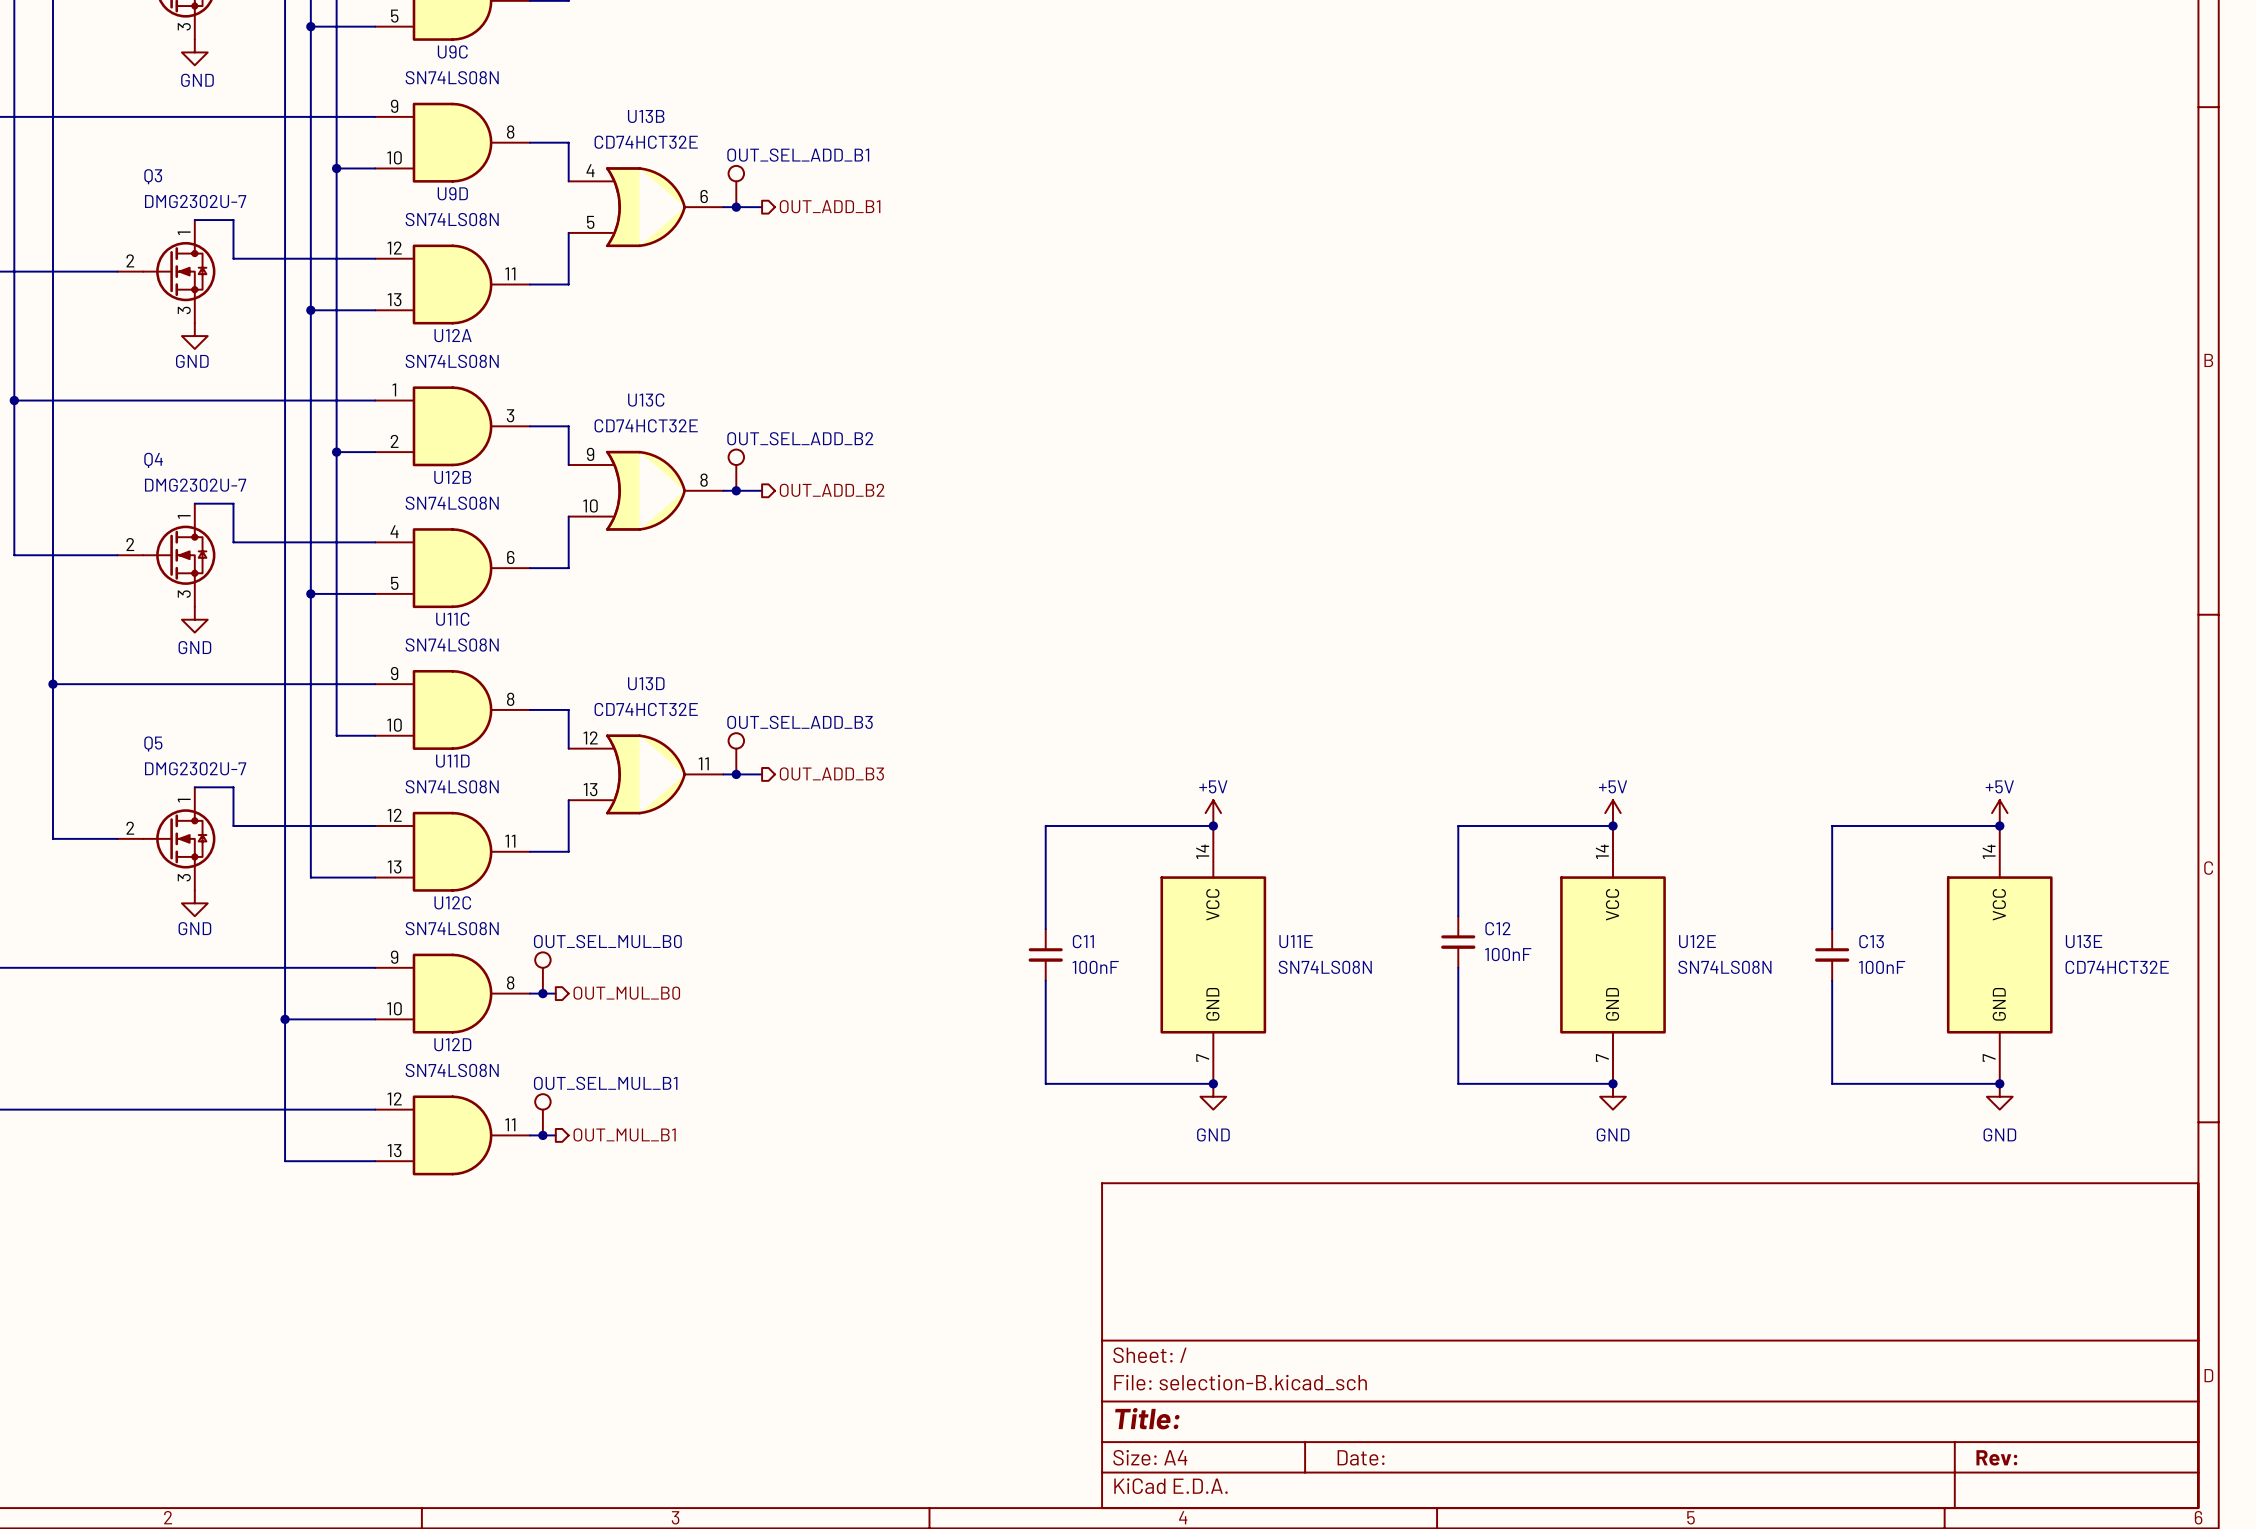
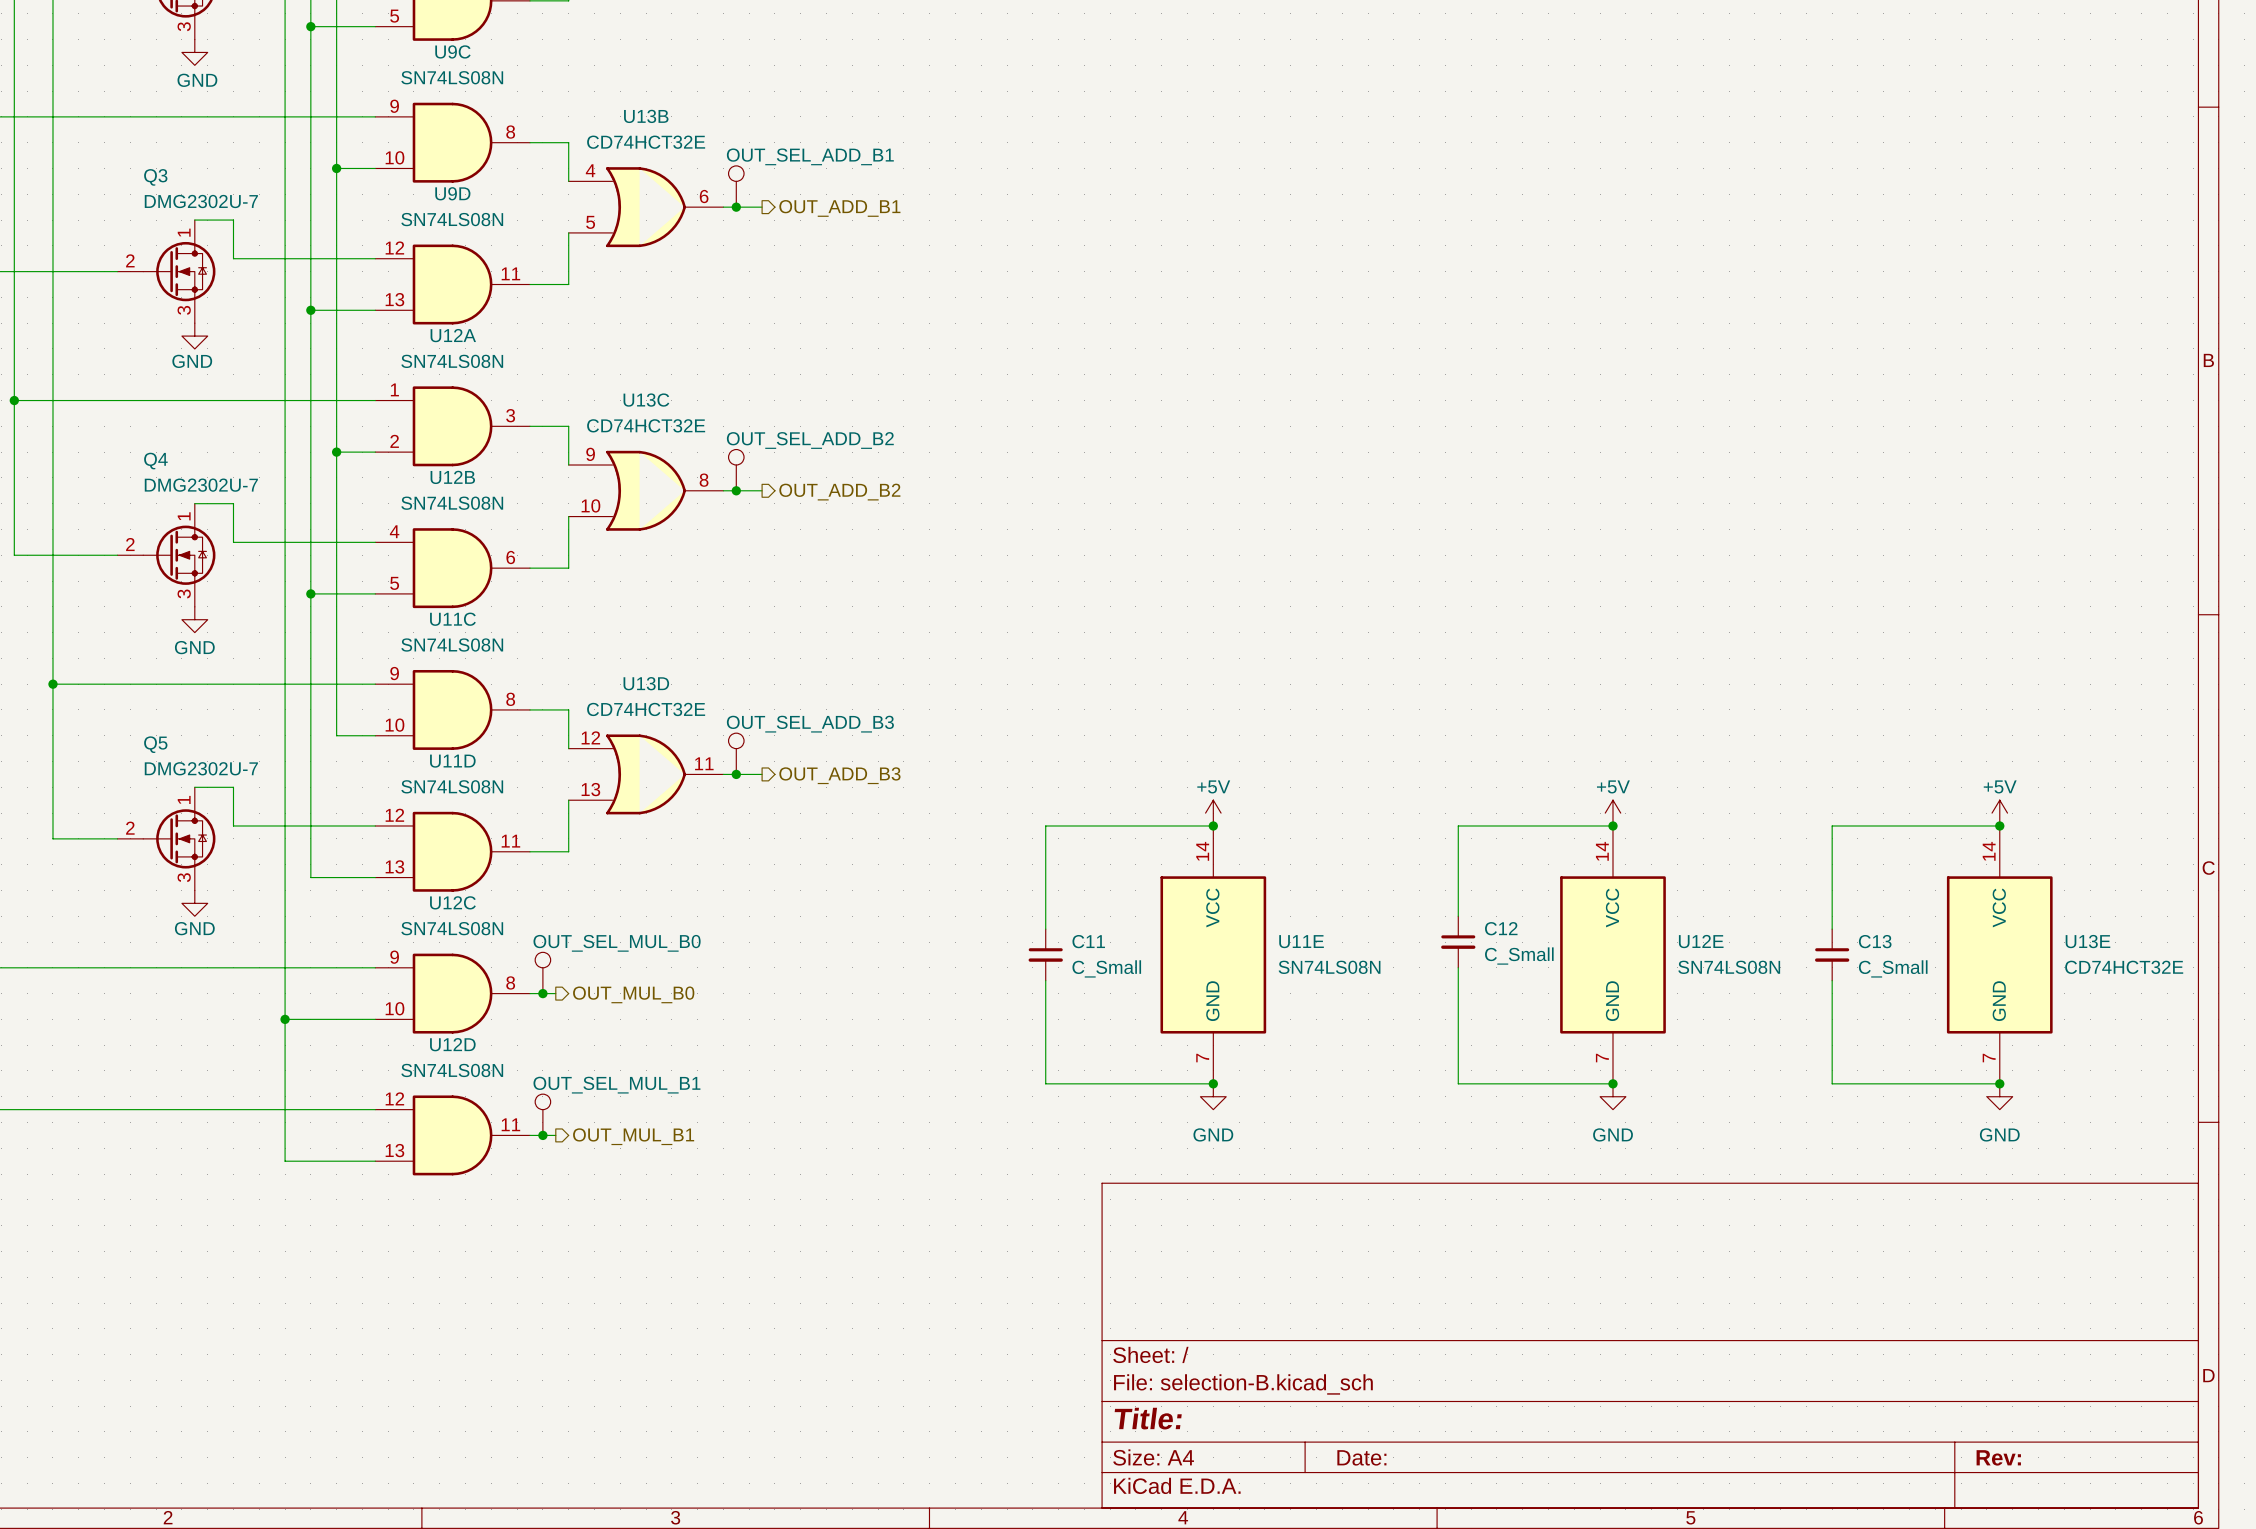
C12 value: 100nF (1508, 954) -> C_Small (1519, 956)
C11 value: 100nF (1095, 967) -> C_Small (1106, 968)
C13 value: 100nF (1882, 967) -> C_Small (1893, 968)

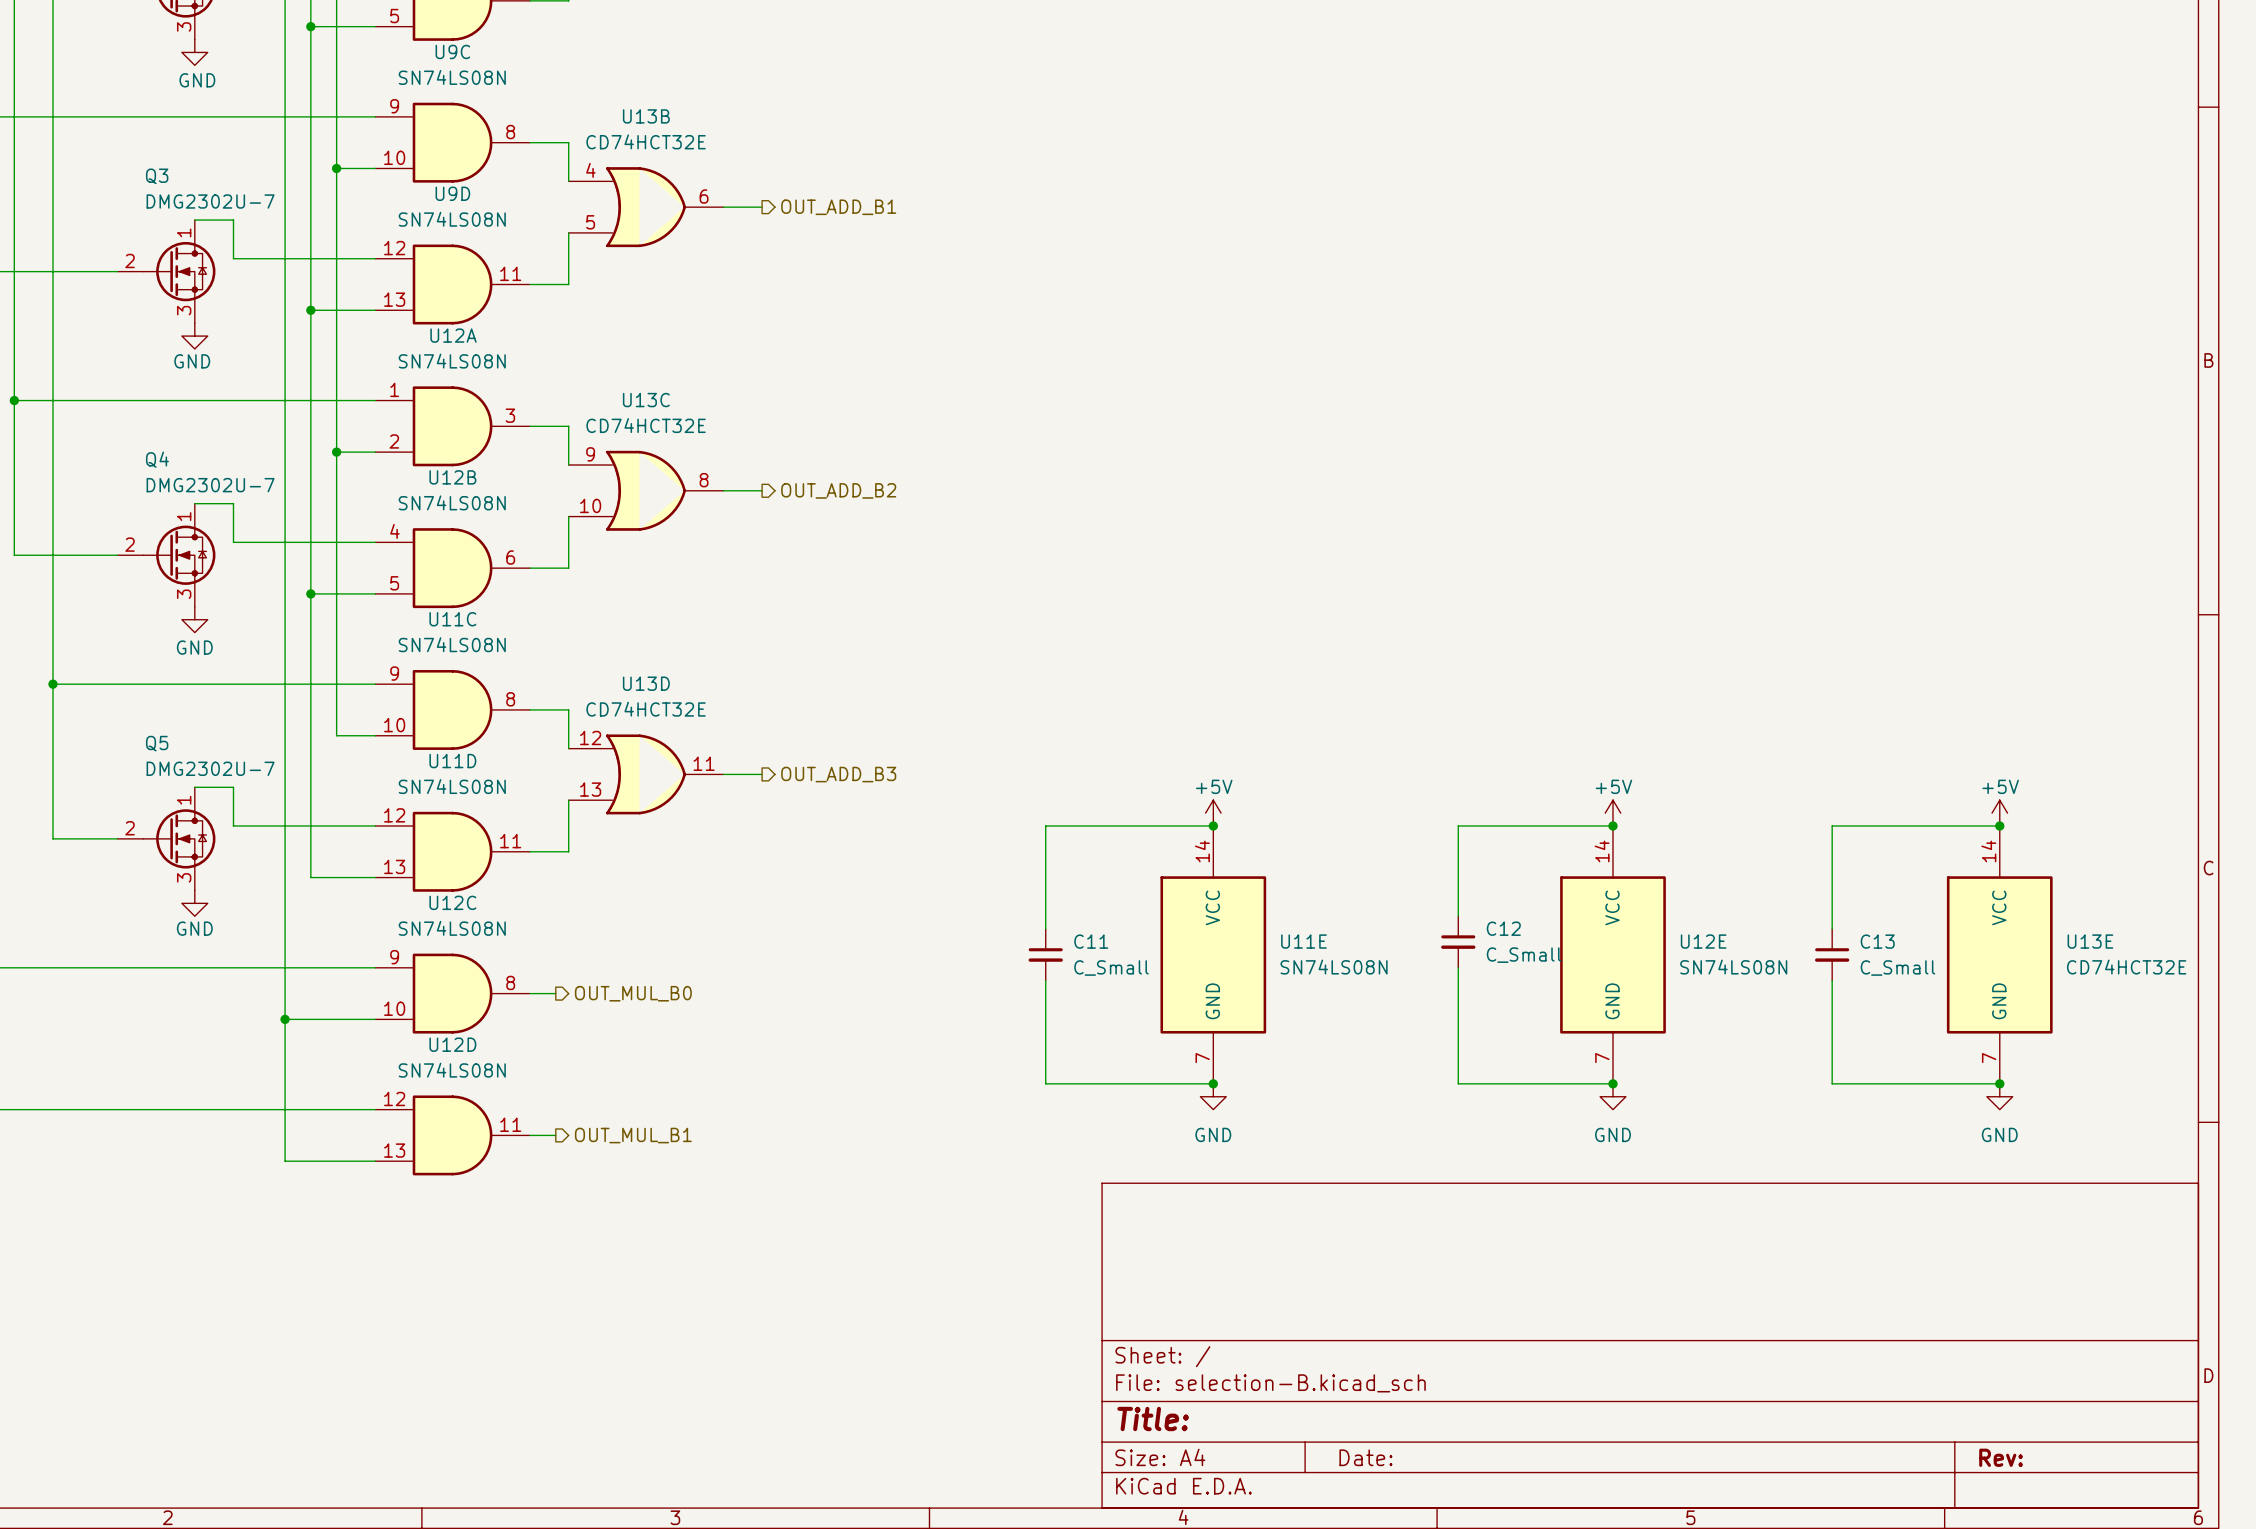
OUT_SEL_ADD_B1: (736, 186) -> none
junction: (736, 207) -> none
OUT_SEL_ADD_B2: (736, 470) -> none
junction: (736, 490) -> none
OUT_SEL_ADD_B3: (736, 753) -> none
junction: (736, 774) -> none
OUT_SEL_MUL_B0: (542, 972) -> none
junction: (542, 993) -> none
OUT_SEL_MUL_B1: (542, 1114) -> none
junction: (542, 1135) -> none

